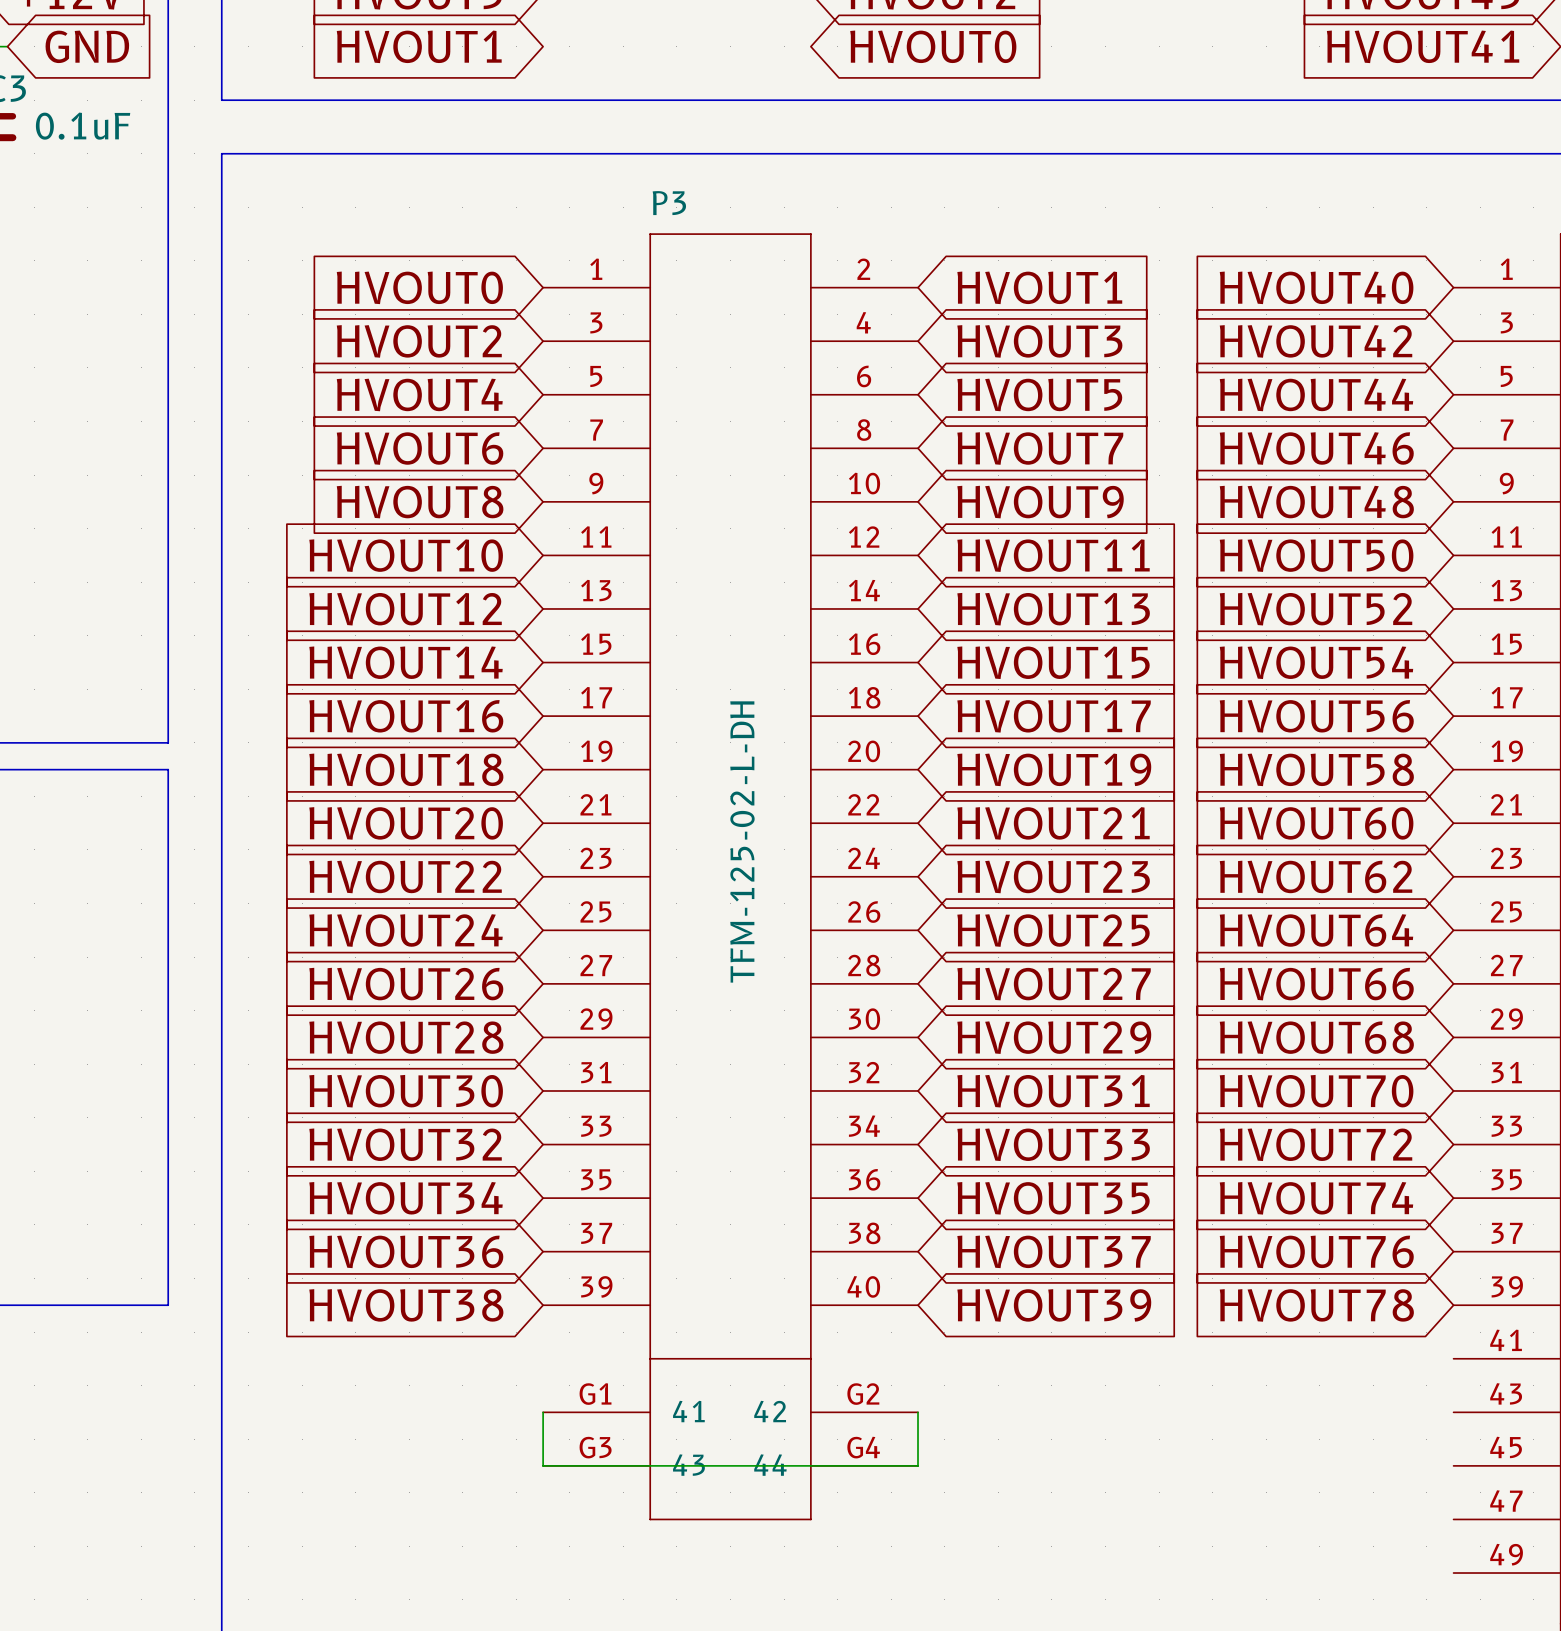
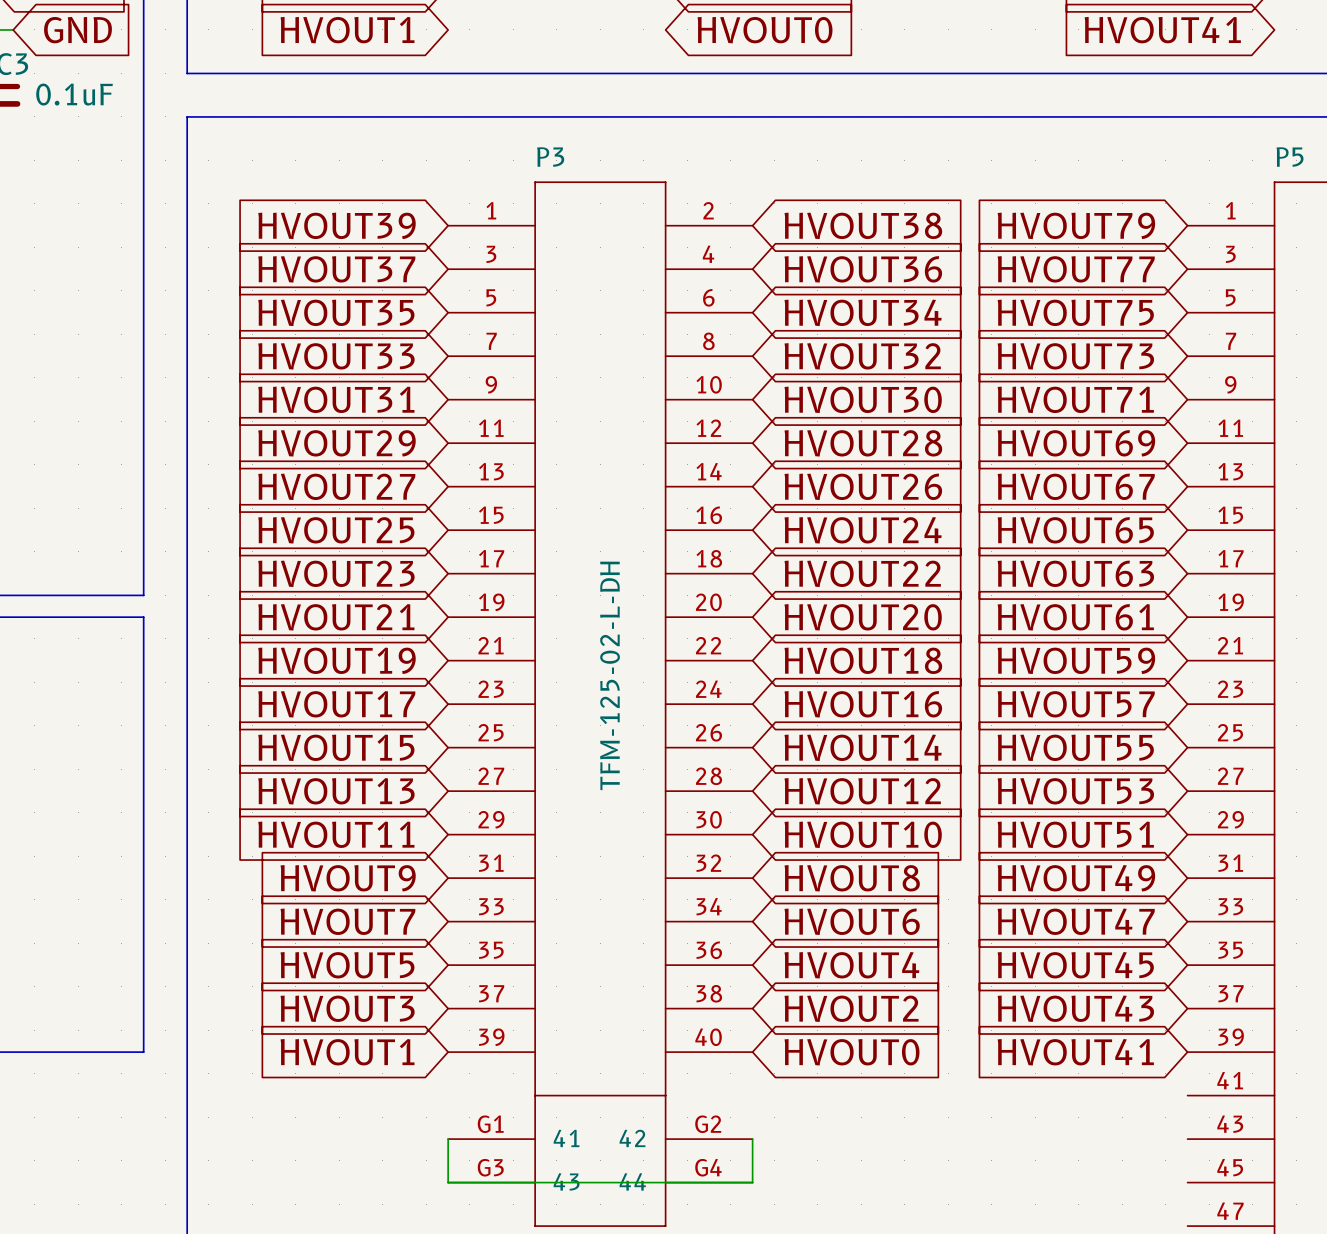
global label: HVOUT0 (419, 287) -> HVOUT39 (336, 225)
global label: HVOUT1 (1039, 287) -> HVOUT38 (863, 225)
global label: HVOUT40 (1316, 287) -> HVOUT79 (1076, 225)
global label: HVOUT2 (419, 341) -> HVOUT37 (336, 269)
global label: HVOUT3 (1039, 341) -> HVOUT36 (863, 269)
global label: HVOUT42 (1316, 341) -> HVOUT77 (1076, 269)
global label: HVOUT4 (419, 394) -> HVOUT35 (336, 312)
global label: HVOUT5 (1039, 394) -> HVOUT34 (863, 312)
global label: HVOUT44 (1316, 394) -> HVOUT75 (1075, 312)
global label: HVOUT6 (420, 448) -> HVOUT33 (336, 356)
global label: HVOUT7 (1040, 448) -> HVOUT32 (862, 356)
global label: HVOUT46 (1316, 448) -> HVOUT73 (1075, 356)
global label: HVOUT8 (420, 502) -> HVOUT31 (336, 399)
global label: HVOUT9 (1040, 502) -> HVOUT30 (863, 399)
global label: HVOUT48 (1316, 502) -> HVOUT71 (1075, 399)
global label: HVOUT10 (406, 555) -> HVOUT29 (336, 443)
global label: HVOUT11 (1053, 555) -> HVOUT28 (863, 443)
global label: HVOUT50 (1316, 555) -> HVOUT69 (1076, 443)
global label: HVOUT12 (405, 609) -> HVOUT27 (336, 486)
global label: HVOUT13 (1053, 609) -> HVOUT26 (863, 486)
global label: HVOUT52 (1316, 609) -> HVOUT67 (1076, 486)
global label: HVOUT14 (406, 662) -> HVOUT25 (336, 530)
global label: HVOUT15 (1053, 662) -> HVOUT24 (863, 530)
global label: HVOUT54 (1316, 662) -> HVOUT65 (1075, 530)
global label: HVOUT16 (406, 716) -> HVOUT23 (336, 573)
global label: HVOUT17 (1054, 716) -> HVOUT22 (862, 573)
global label: HVOUT56 (1316, 716) -> HVOUT63 (1075, 573)
global label: HVOUT18 (406, 769) -> HVOUT21 (336, 617)
global label: HVOUT19 (1054, 769) -> HVOUT20 (863, 617)
global label: HVOUT58 (1316, 769) -> HVOUT61 (1075, 617)
global label: HVOUT20 (406, 823) -> HVOUT19 (336, 660)
global label: HVOUT21 (1053, 823) -> HVOUT18 (863, 660)
global label: HVOUT60 (1316, 823) -> HVOUT59 (1076, 660)
global label: HVOUT22 (405, 876) -> HVOUT17 (336, 704)
global label: HVOUT23 (1053, 876) -> HVOUT16 (863, 704)
global label: HVOUT62 (1316, 876) -> HVOUT57 (1076, 704)
global label: HVOUT24 (406, 930) -> HVOUT15 (336, 747)
global label: HVOUT25 (1053, 930) -> HVOUT14 (863, 747)
global label: HVOUT64 (1316, 930) -> HVOUT55 (1075, 747)
global label: HVOUT26 (406, 984) -> HVOUT13 (336, 791)
global label: HVOUT27 (1054, 984) -> HVOUT12 (862, 791)
global label: HVOUT66 (1316, 984) -> HVOUT53 (1075, 791)
global label: HVOUT28 (406, 1037) -> HVOUT11 (336, 834)
global label: HVOUT29 (1054, 1037) -> HVOUT10 (863, 834)
global label: HVOUT68 (1316, 1037) -> HVOUT51 (1075, 834)
global label: HVOUT30 (406, 1091) -> HVOUT9 (348, 878)
global label: HVOUT31 (1053, 1091) -> HVOUT8 (852, 878)
global label: HVOUT70 (1316, 1091) -> HVOUT49 (1076, 878)
global label: HVOUT32 (405, 1144) -> HVOUT7 (347, 921)
global label: HVOUT33 (1053, 1144) -> HVOUT6 (852, 921)
global label: HVOUT72 (1316, 1144) -> HVOUT47 (1076, 921)
global label: HVOUT34 (406, 1198) -> HVOUT5 (347, 965)
global label: HVOUT35 (1053, 1198) -> HVOUT4 (851, 965)
global label: HVOUT74 (1316, 1198) -> HVOUT45 (1075, 965)
global label: HVOUT36 (406, 1251) -> HVOUT3 (347, 1008)
global label: HVOUT37 (1054, 1251) -> HVOUT2 (851, 1008)
global label: HVOUT76 (1316, 1251) -> HVOUT43 (1075, 1008)
global label: HVOUT38 (406, 1305) -> HVOUT1 (347, 1052)
global label: HVOUT39 (1054, 1305) -> HVOUT0 (852, 1052)
global label: HVOUT78 (1316, 1305) -> HVOUT41 (1075, 1052)

